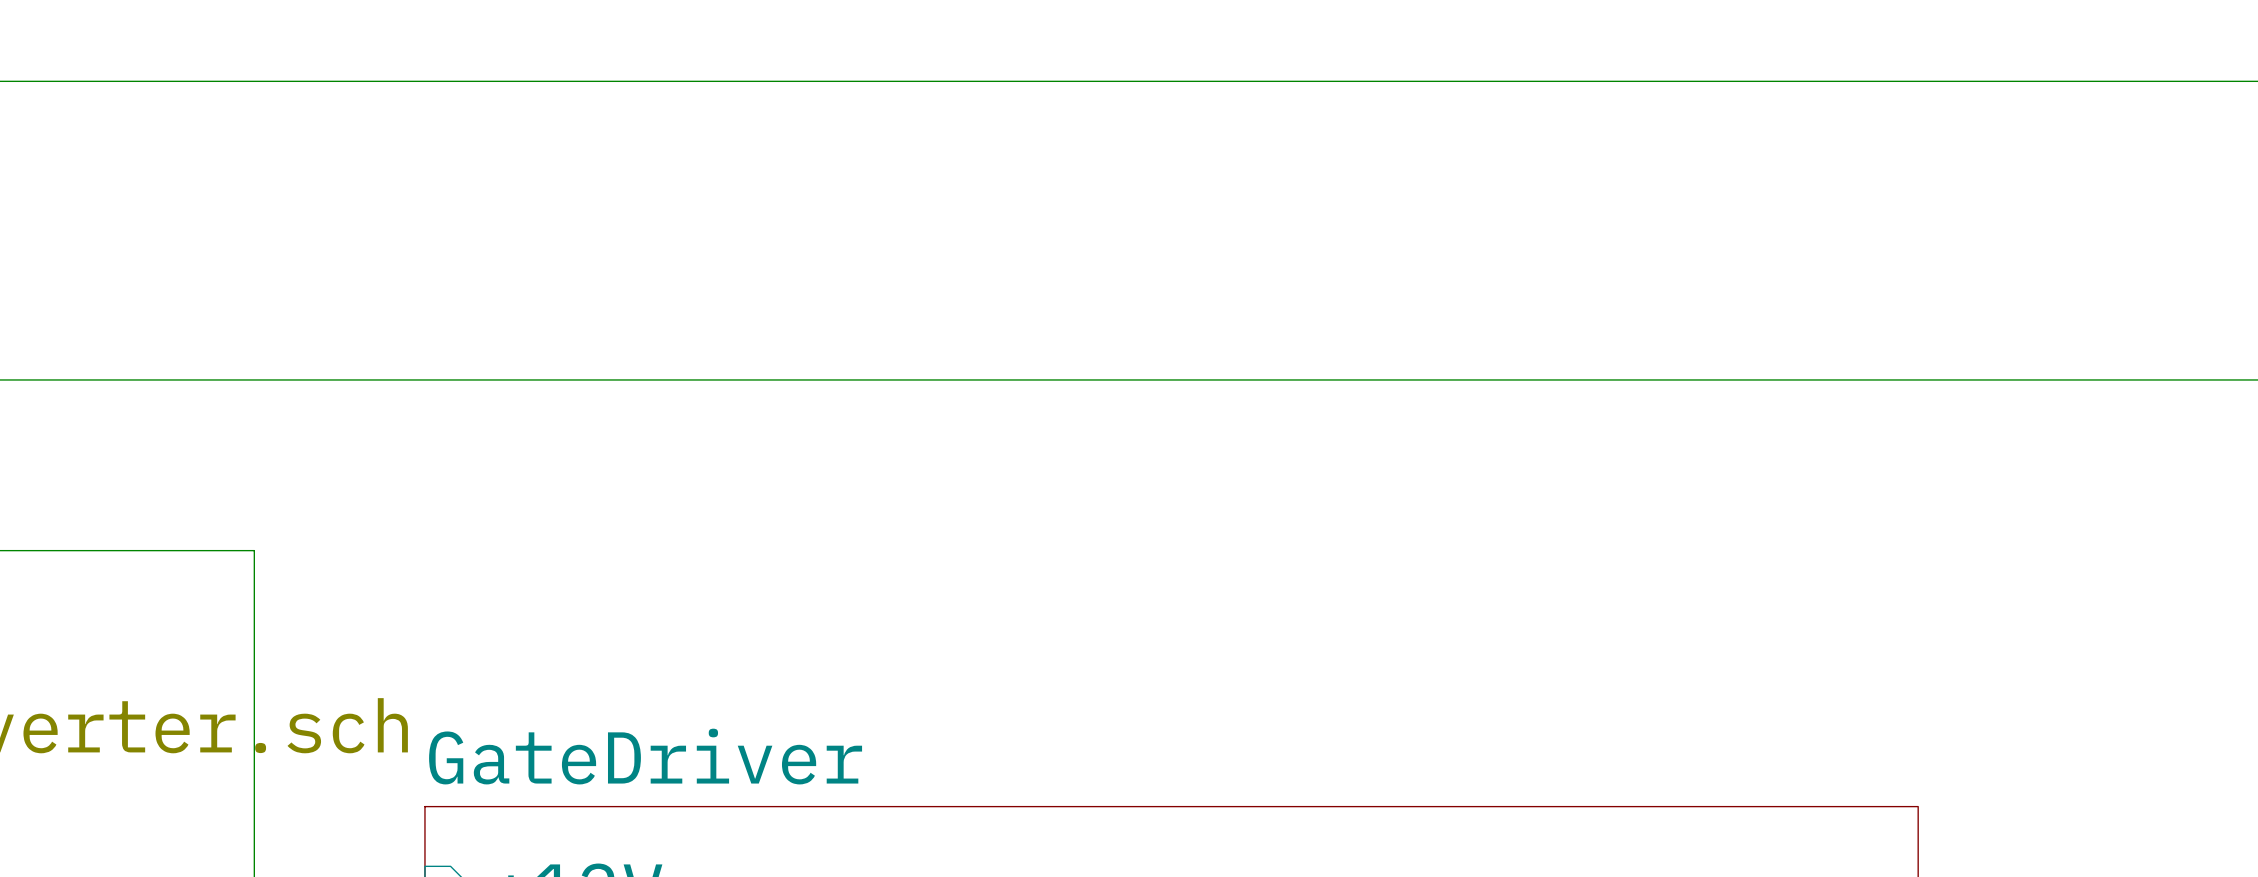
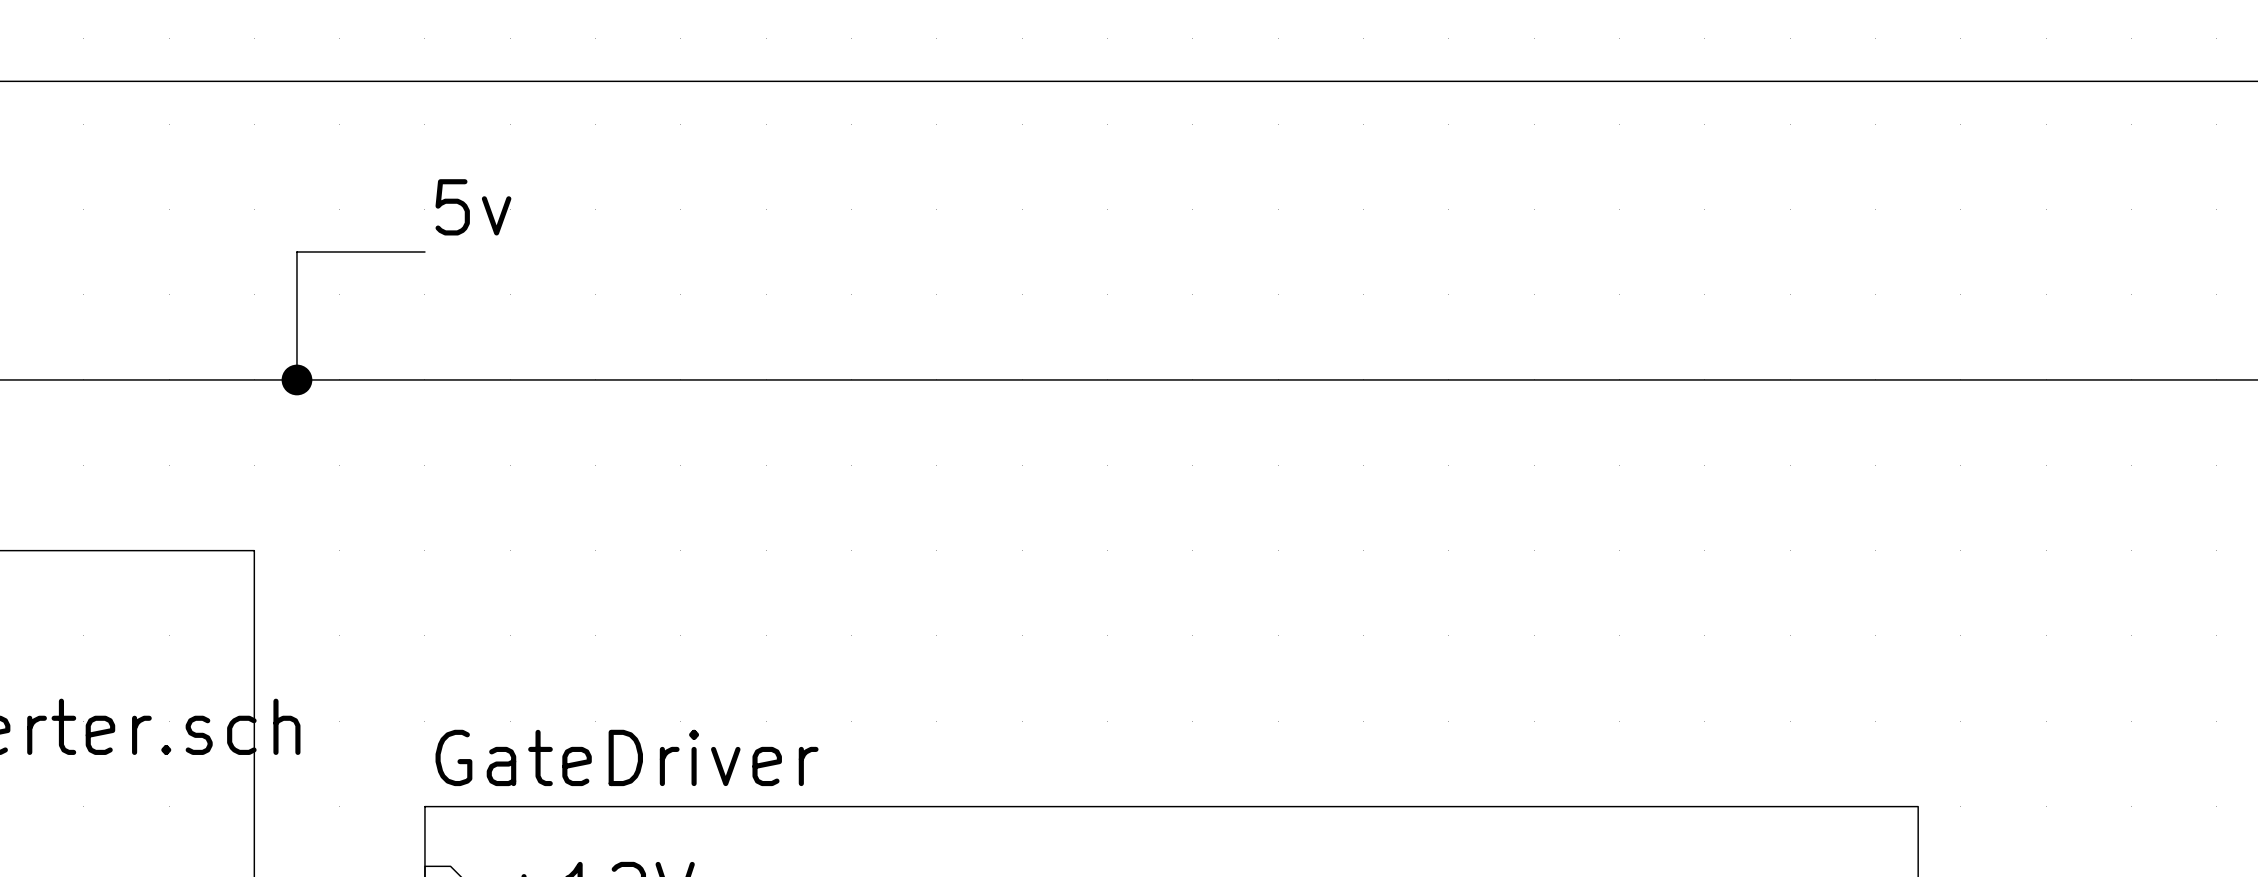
label: none -> 5v (473, 207)
wire: none -> (424, 251) (296, 251) (296, 379)
junction: none -> (296, 379)

